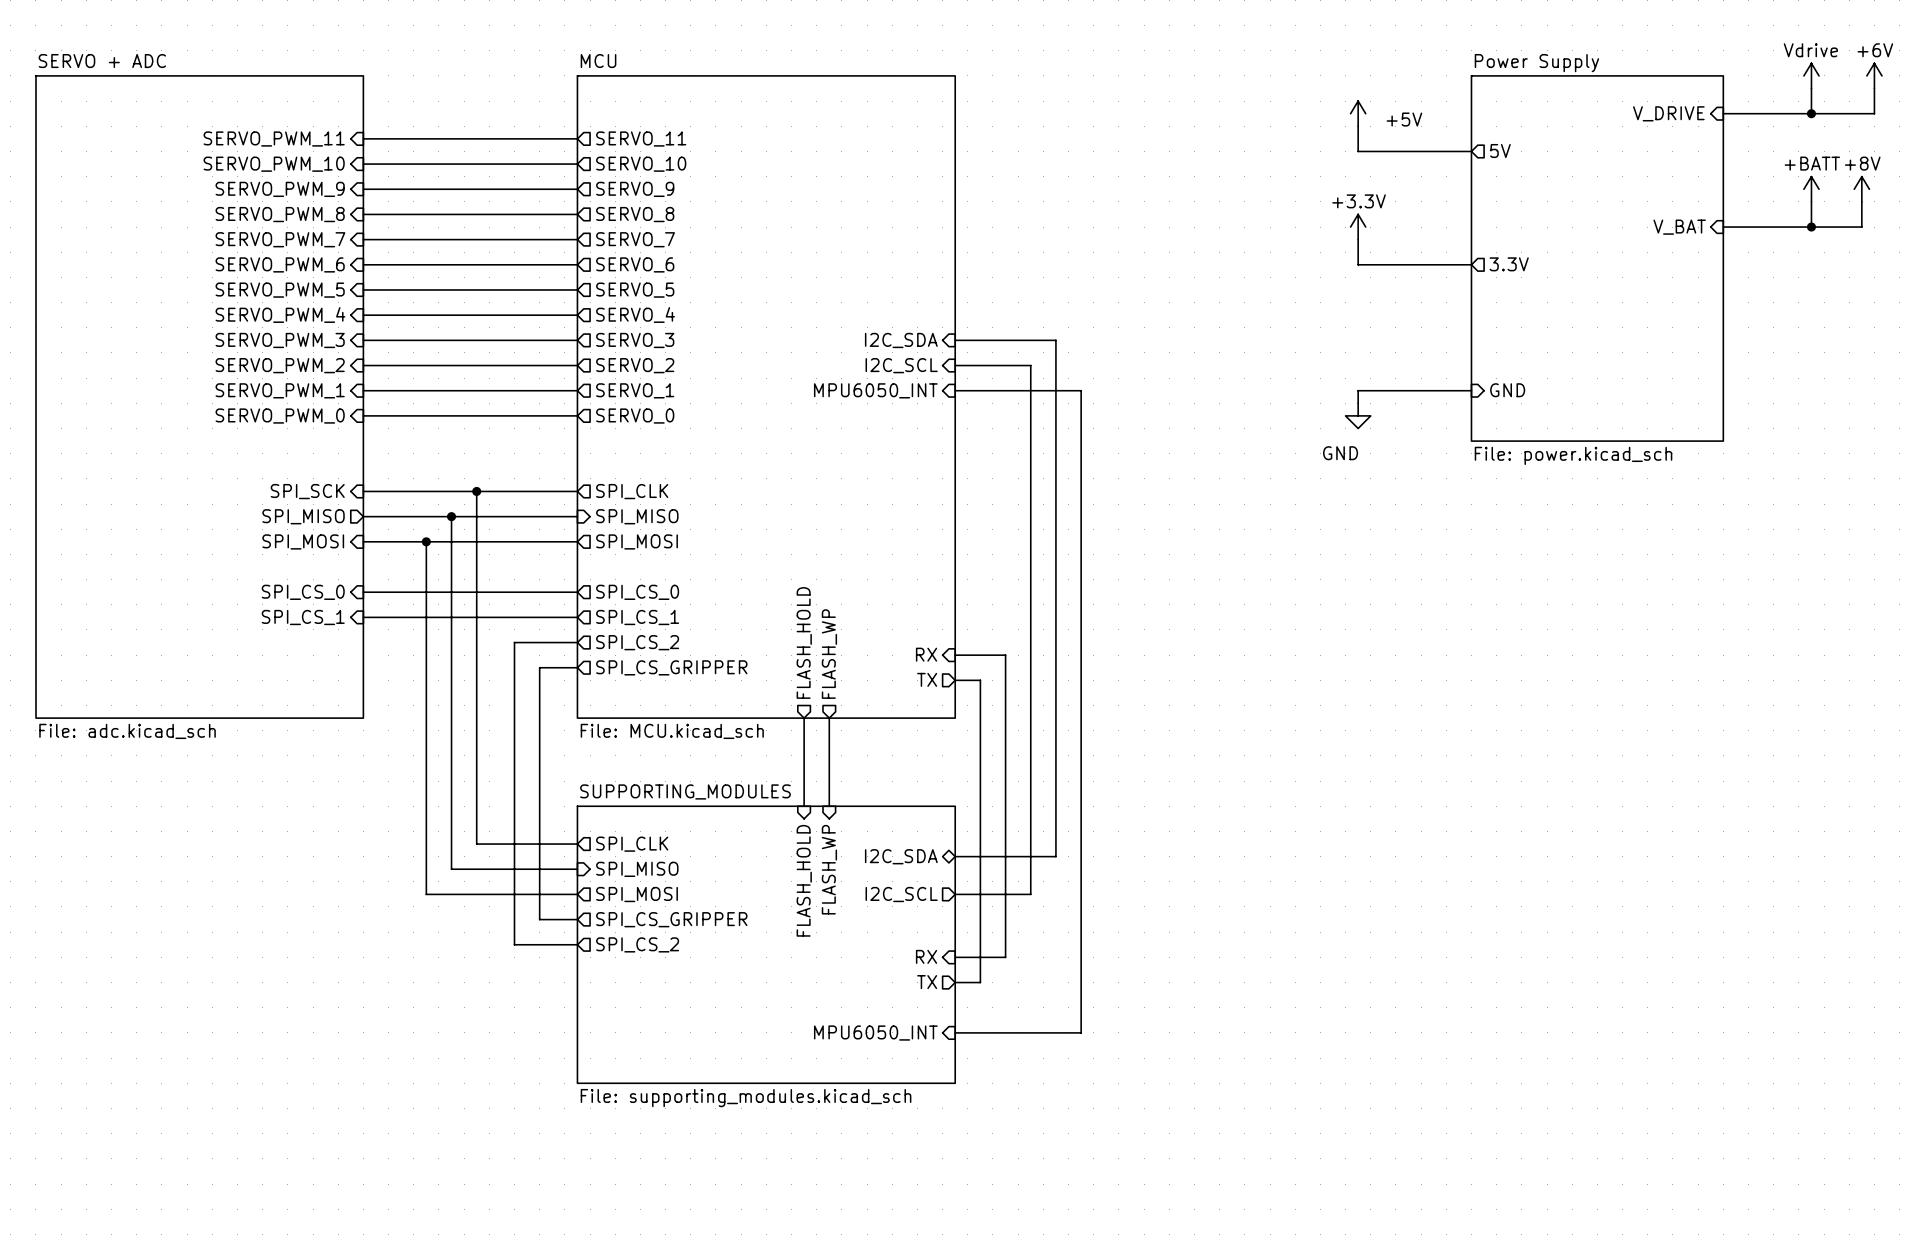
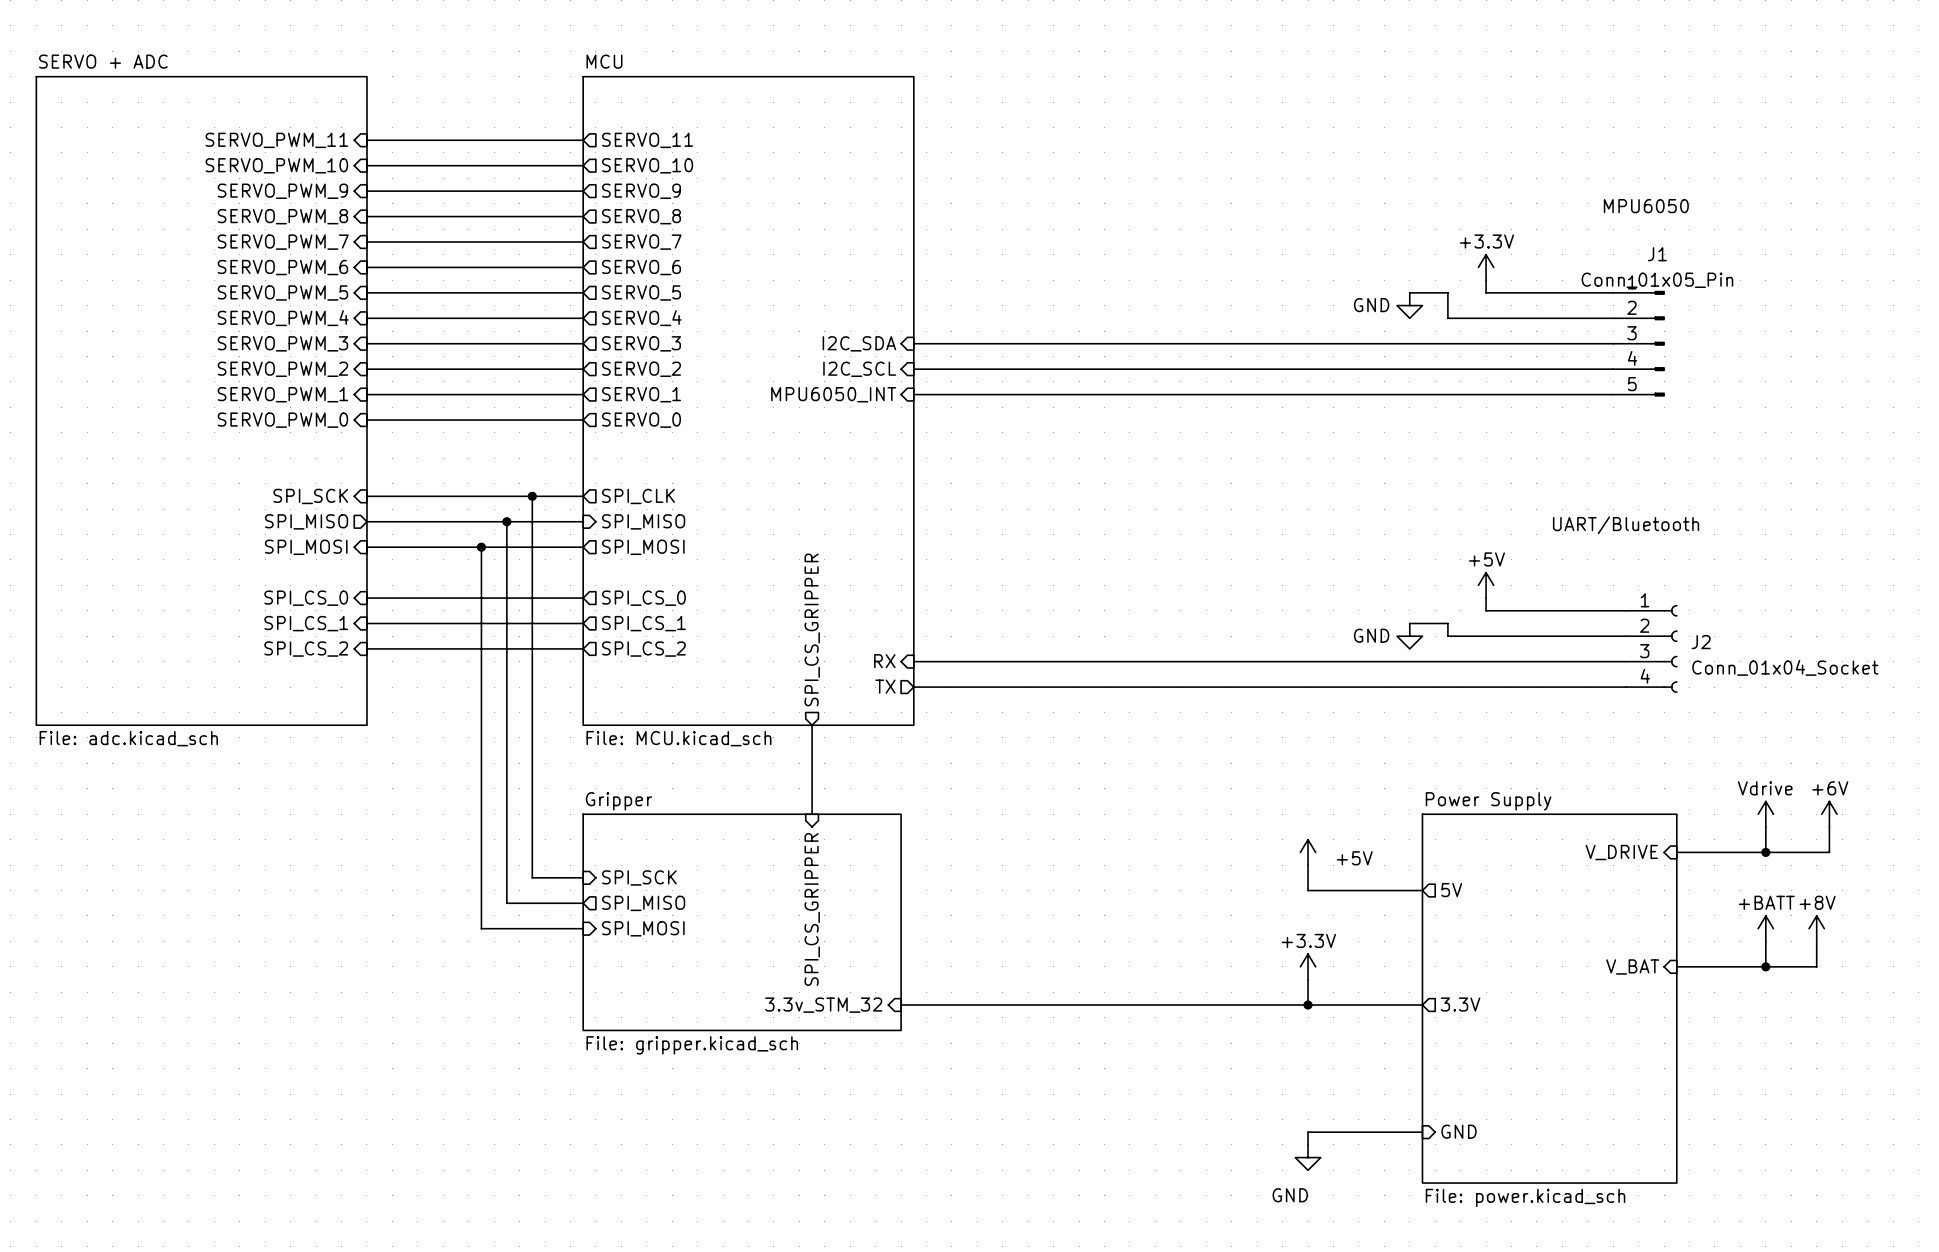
power symbol: Vdrive (1811, 75) -> none
power symbol: +6V (1874, 75) -> none
wire: (1811, 88) (1811, 113) -> none
wire: (1874, 88) (1874, 113) (1723, 113) -> none
power symbol: +5V (1358, 113) -> none
sheet pin: V_DRIVE (1668, 113) -> none
junction: (1811, 113) -> none
wire: (1358, 126) (1358, 151) (1471, 151) -> none
sheet pin: 5V (1500, 151) -> none
power symbol: +BATT (1811, 189) -> none
power symbol: +8V (1861, 189) -> none
wire: (1811, 201) (1811, 227) -> none
wire: (1861, 201) (1861, 227) (1723, 227) -> none
text: none -> MPU6050 (1646, 206)
power symbol position: +3.3V (1358, 227) -> +3.3V (1486, 267)
sheet pin: V_BAT (1679, 227) -> none
junction: (1811, 227) -> none
wire: (1358, 239) (1358, 264) (1471, 264) -> none
sheet Power Supply: File: power.kicad_sch (1597, 258) -> none
sheet pin: 3.3V (1509, 264) -> none
wire: none -> (1486, 280) (1486, 292) (1613, 292)
wire: none -> (1409, 292) (1447, 292) (1447, 318) (1613, 318)
power symbol: none -> GND (1409, 305)
sheet pin position: I2C_SDA (901, 340) -> I2C_SDA (859, 343)
bus: none -> (913, 343) (964, 343)
bus: (1055, 340) (1055, 856) (955, 856) -> (1066, 343) (1613, 343)
J1: none -> Conn_01x05_Pin (1639, 343)
sheet pin position: I2C_SCL (901, 365) -> I2C_SCL (859, 369)
bus: none -> (913, 369) (964, 369)
bus: (1030, 365) (1030, 894) (955, 894) -> (1040, 369) (1613, 369)
sheet pin position: MPU6050_INT (875, 390) -> MPU6050_INT (833, 394)
wire: none -> (913, 394) (964, 394)
wire: (1081, 390) (1081, 1032) (955, 1032) -> none
wire: (1358, 390) (1358, 403) -> (1371, 394) (1091, 394)
wire: none -> (1486, 394) (1613, 394)
sheet pin: GND (1507, 390) -> none
sheet MCU: none -> File: MCU.kicad_sch (748, 400)
sheet MCU: File: MCU.kicad_sch (766, 397) -> none
power symbol: GND (1358, 415) -> none
bus: (476, 491) (476, 541) -> none
junction: (476, 491) -> none
junction: none -> (532, 496)
bus: (451, 516) (451, 869) (527, 869) -> (532, 496) (532, 877)
junction: (451, 516) -> none
junction: none -> (506, 521)
text: none -> UART/Bluetooth (1626, 525)
bus: (426, 541) (426, 894) (501, 894) -> (506, 521) (506, 903)
junction: (426, 541) -> none
junction: none -> (481, 547)
power symbol: none -> +5V (1486, 585)
wire: none -> (1486, 598) (1486, 610) (1625, 610)
wire: none -> (1409, 623) (1447, 623) (1447, 636) (1625, 636)
power symbol: none -> GND (1409, 636)
sheet pin: none -> SPI_CS_2 (306, 649)
bus: (514, 642) (514, 944) (577, 944) -> (519, 648) (366, 648)
sheet pin: FLASH_HOLD (804, 642) -> SPI_CS_GRIPPER (812, 629)
J2: none -> Conn_01x04_Socket (1651, 648)
sheet pin: FLASH_WP (829, 654) -> none
sheet pin position: RX (926, 654) -> RX (884, 661)
bus: none -> (913, 661) (964, 661)
bus: (1005, 655) (1005, 957) (955, 957) -> (1015, 661) (1625, 661)
bus: (577, 667) (539, 667) (539, 919) -> none
sheet pin: SPI_CS_GRIPPER (671, 667) -> none
sheet pin position: TX (927, 679) -> TX (885, 686)
bus: none -> (913, 687) (964, 687)
bus: (980, 680) (980, 982) (955, 982) -> (990, 687) (1625, 687)
wire: (829, 718) (829, 806) -> none
power symbol: none -> Vdrive (1765, 814)
power symbol: none -> +6V (1829, 814)
wire: none -> (1765, 826) (1765, 852)
wire: none -> (1829, 826) (1829, 852) (1676, 852)
bus: (476, 844) (577, 844) -> (481, 852) (481, 928) (545, 928)
sheet pin: SPI_CLK (632, 844) -> none
power symbol: none -> +5V (1308, 852)
sheet pin: none -> V_DRIVE (1621, 852)
junction: none -> (1765, 852)
sheet pin: I2C_SDA (901, 856) -> none
wire: none -> (1308, 865) (1308, 890) (1422, 890)
sheet pin: SPI_MISO (637, 869) -> SPI_SCK (639, 877)
sheet pin: FLASH_WP (829, 869) -> none
sheet pin: FLASH_HOLD (804, 880) -> SPI_CS_GRIPPER (812, 909)
sheet pin: none -> 5V (1451, 890)
sheet pin: SPI_MOSI (637, 894) -> SPI_MISO (643, 903)
sheet pin: I2C_SCL (901, 894) -> none
sheet Gripper: none -> File: gripper.kicad_sch (742, 922)
sheet pin shape: output (671, 919) -> input (643, 928)
sheet pin: SPI_CS_GRIPPER (671, 919) -> SPI_MOSI (643, 928)
power symbol: none -> +BATT (1765, 928)
power symbol: none -> +8V (1816, 928)
wire: none -> (1765, 941) (1765, 966)
wire: none -> (1816, 941) (1816, 966) (1676, 966)
sheet pin: SPI_CS_2 (637, 944) -> none
sheet SUPPORTING_MODULES: File: supporting_modules.kicad_sch (766, 944) -> none
sheet pin: RX (926, 956) -> none
power symbol: none -> +3.3V (1308, 966)
sheet pin: none -> V_BAT (1632, 966)
junction: none -> (1765, 966)
wire: none -> (1308, 979) (1308, 1005)
sheet pin: TX (927, 982) -> none
sheet Power Supply: none -> File: power.kicad_sch (1549, 998)
sheet pin: none -> 3.3V (1460, 1004)
sheet pin: none -> 3.3v_STM_32 (823, 1005)
wire: none -> (901, 1005) (1422, 1005)
junction: none -> (1308, 1005)
sheet pin: MPU6050_INT (875, 1033) -> none
sheet pin: none -> GND (1459, 1131)
wire: none -> (1422, 1132) (1308, 1132) (1308, 1144)
power symbol: none -> GND (1308, 1157)

